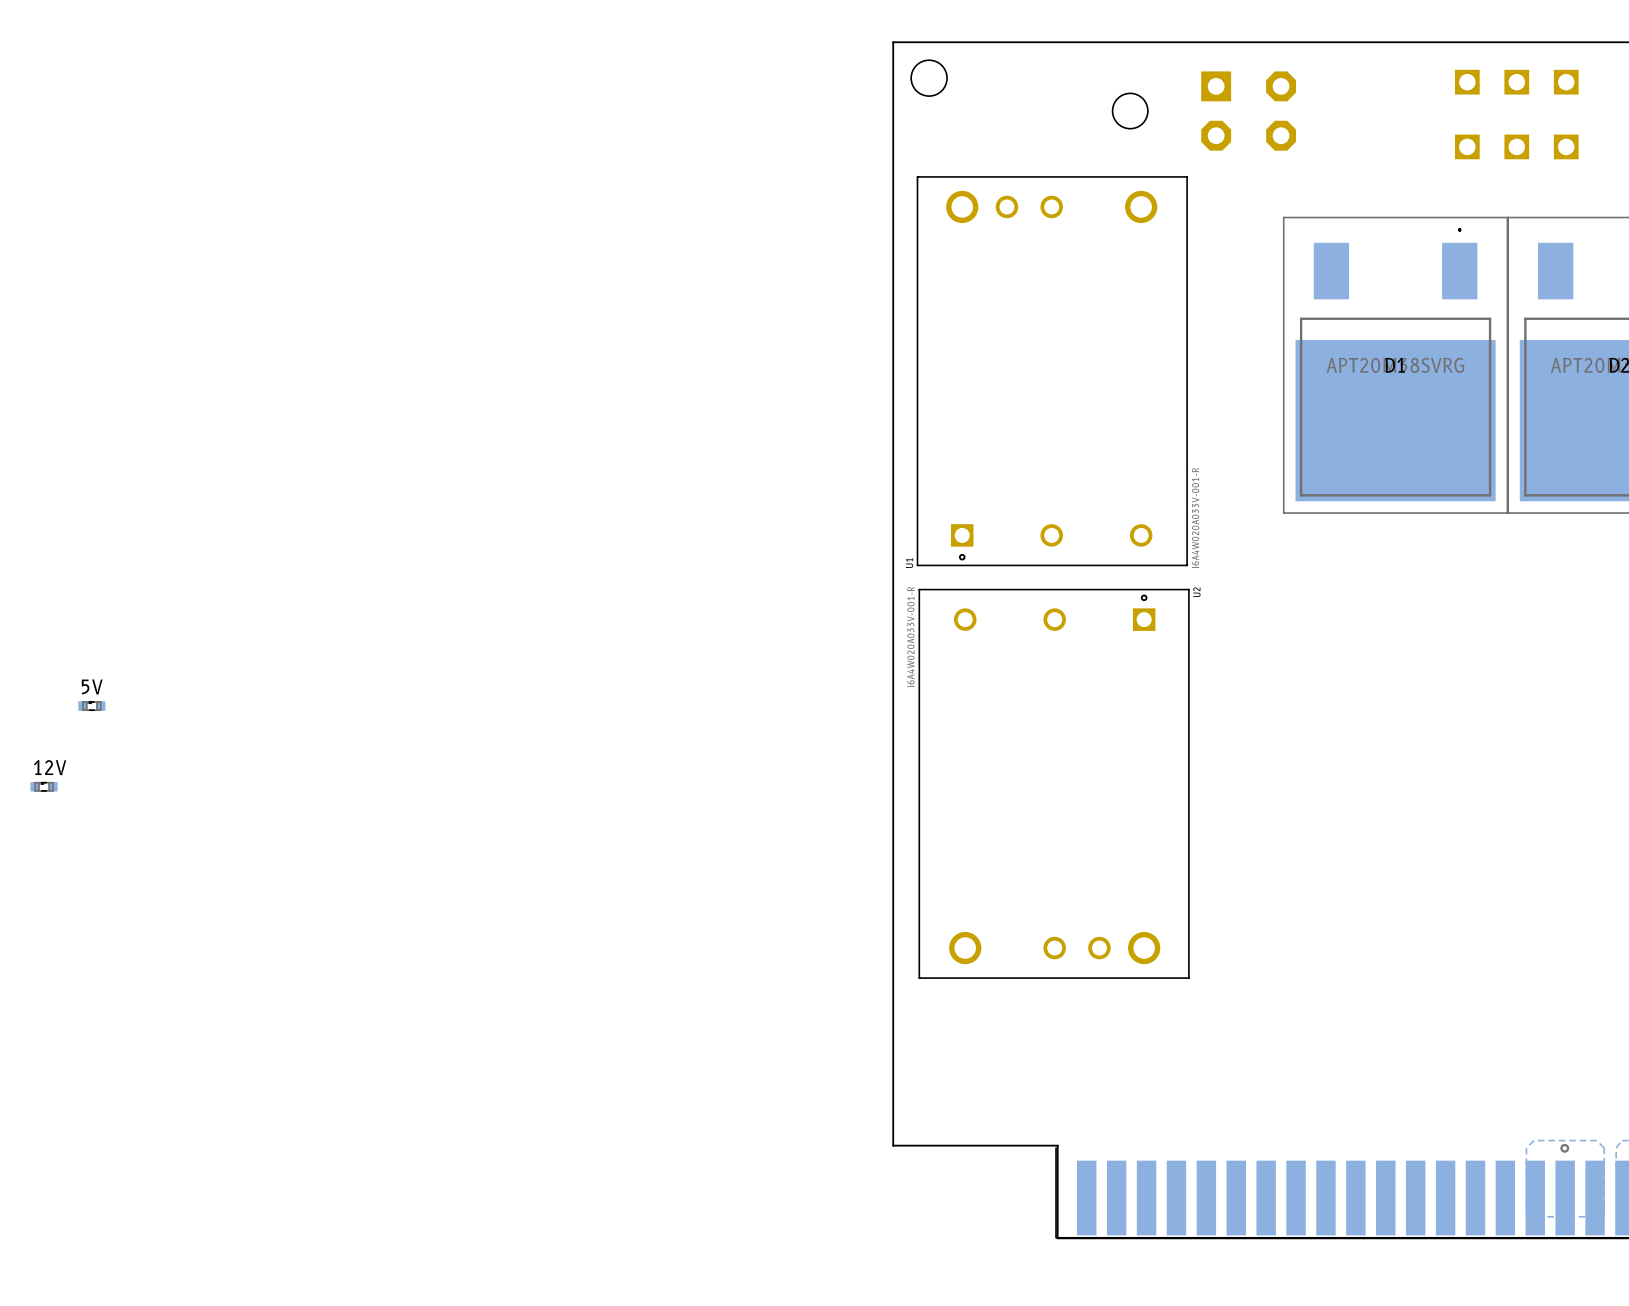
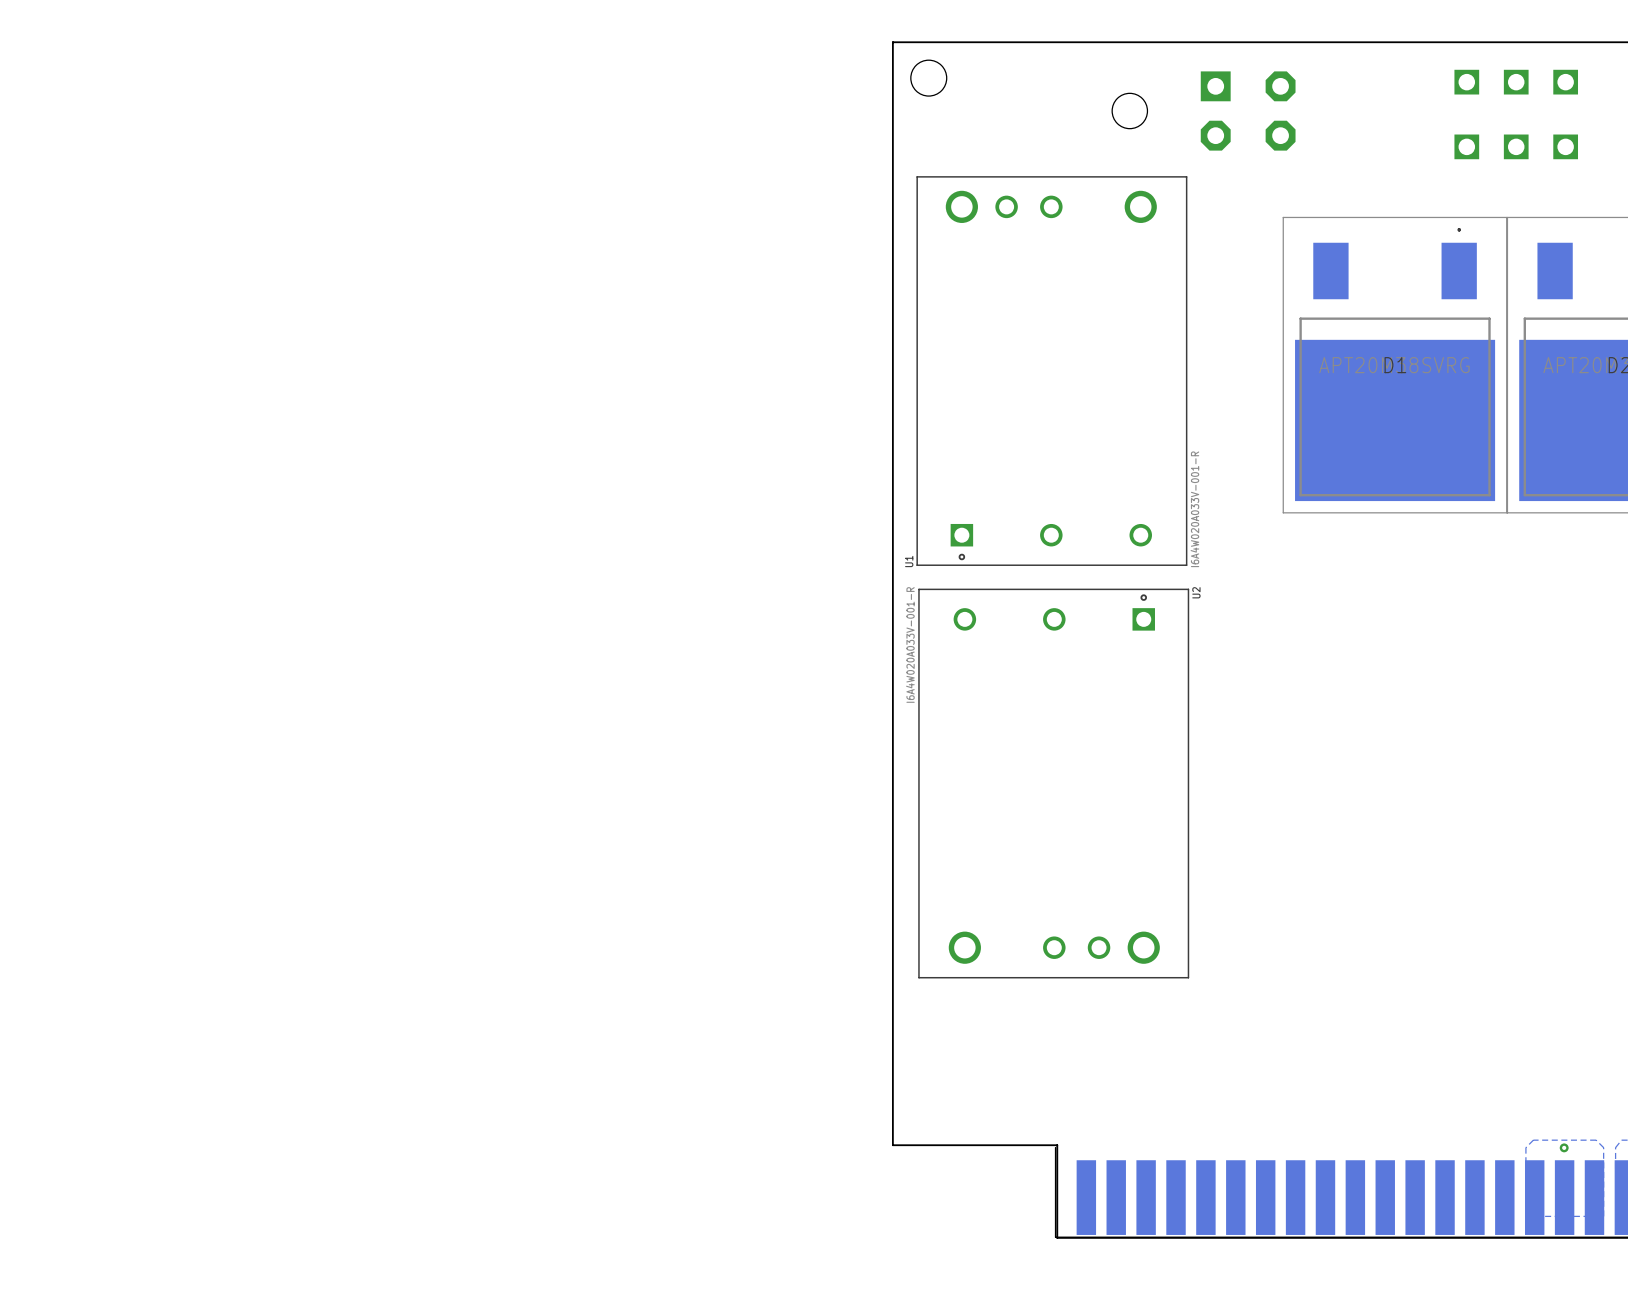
5V: (91, 706) -> none
12V: (44, 786) -> none

